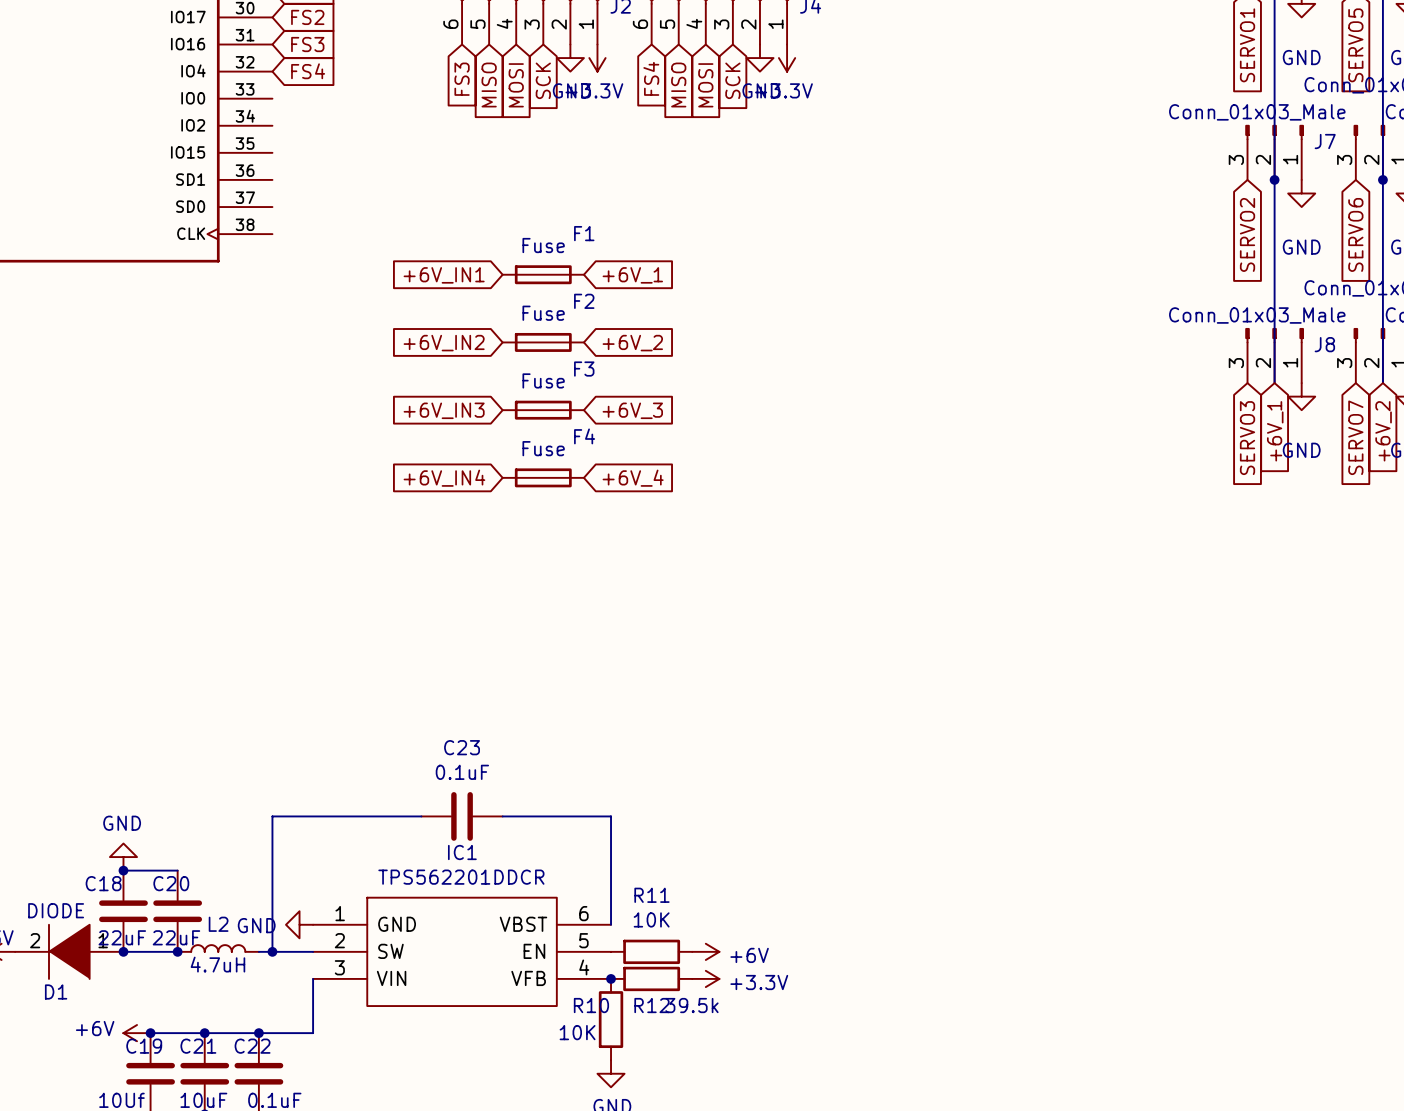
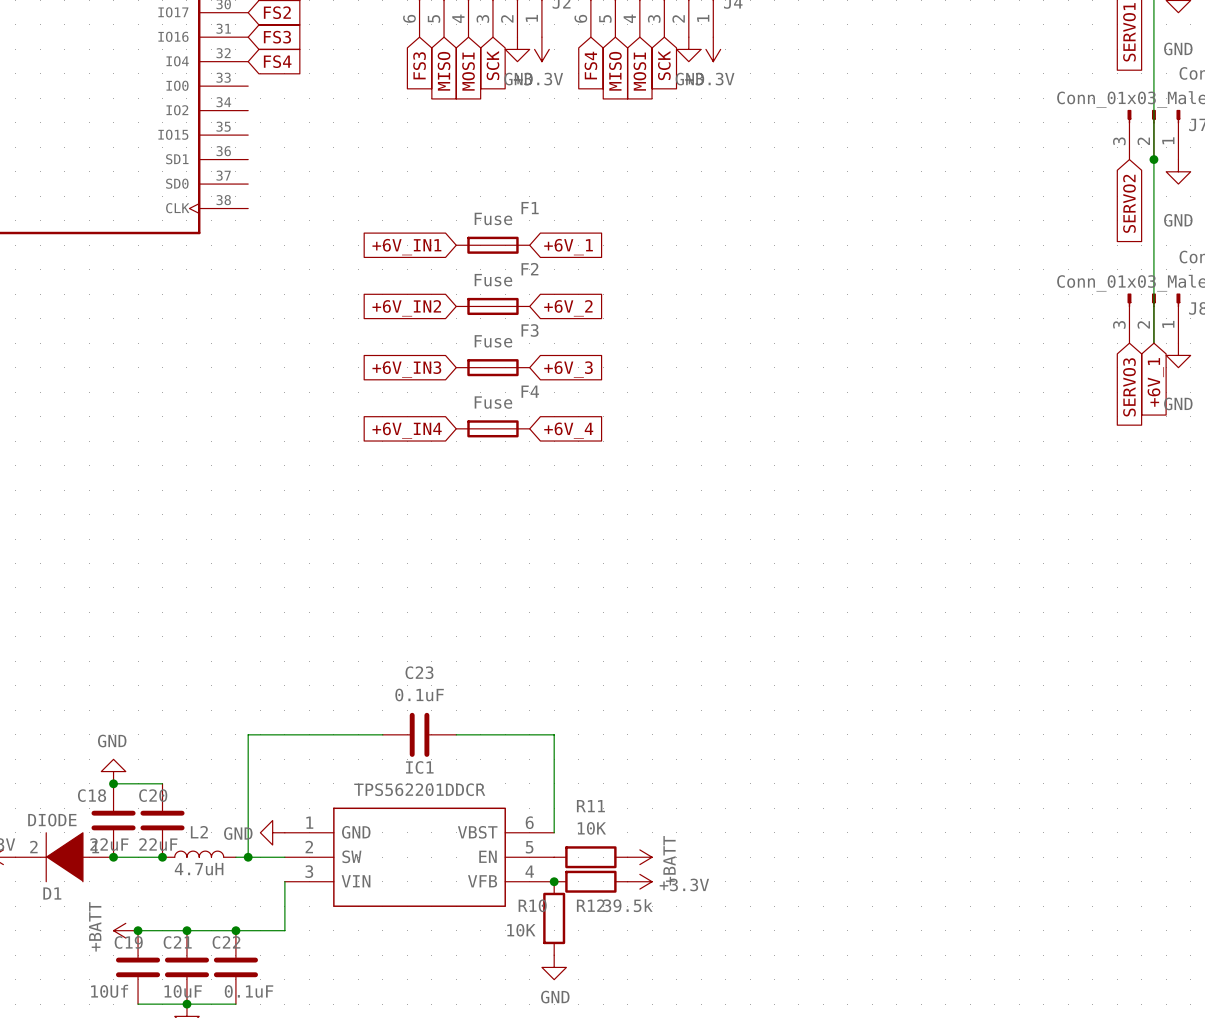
power symbol: +6V (705, 951) -> +BATT (639, 857)
power symbol: +6V (137, 1033) -> +BATT (125, 930)

